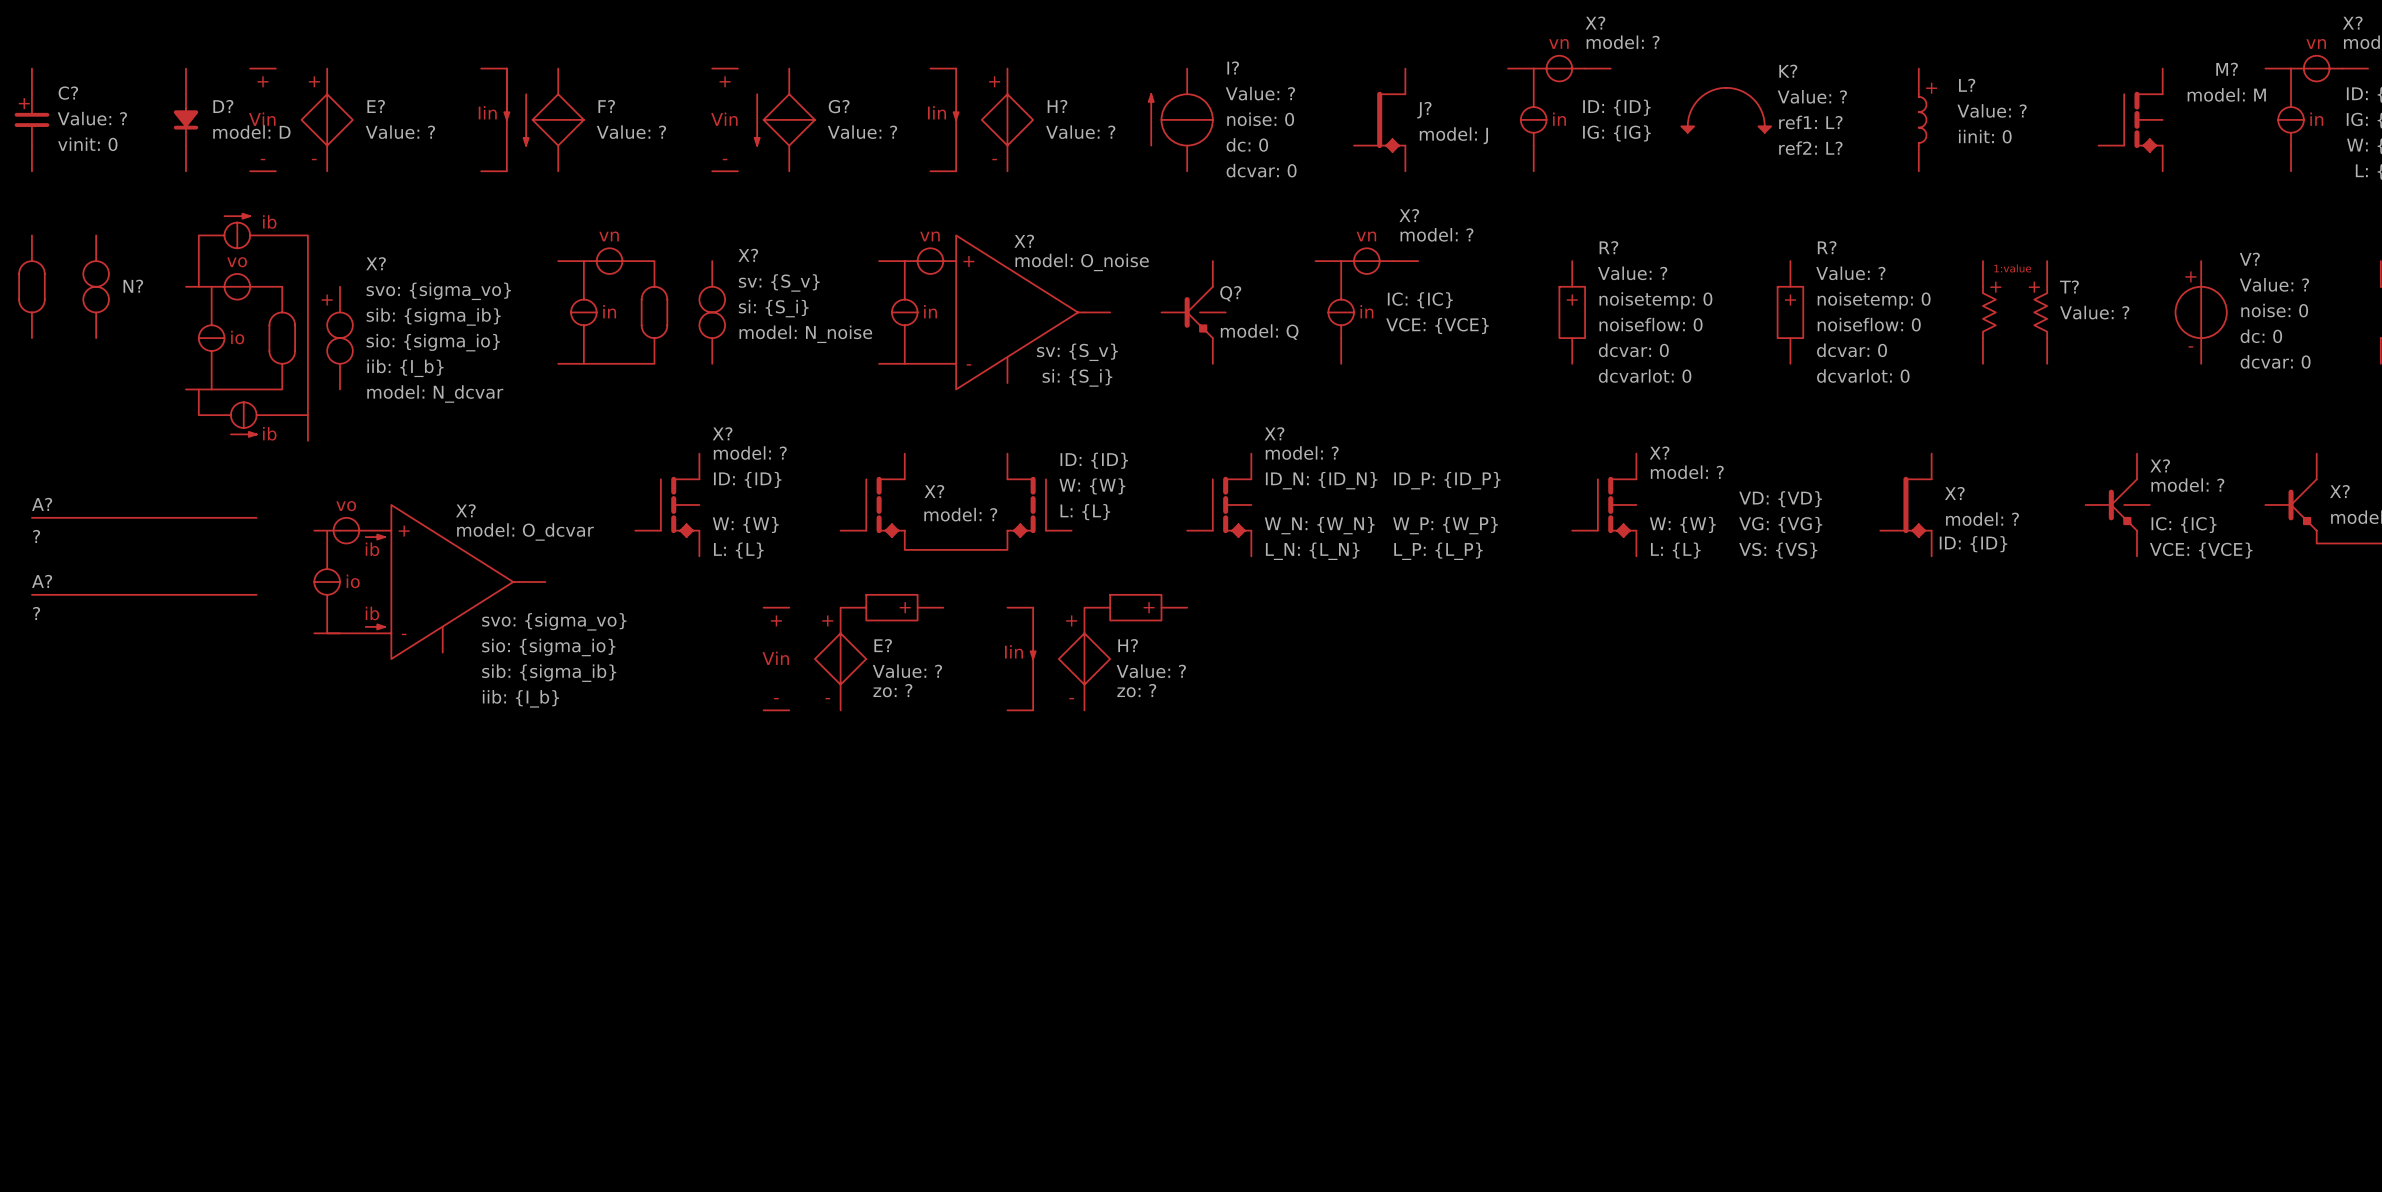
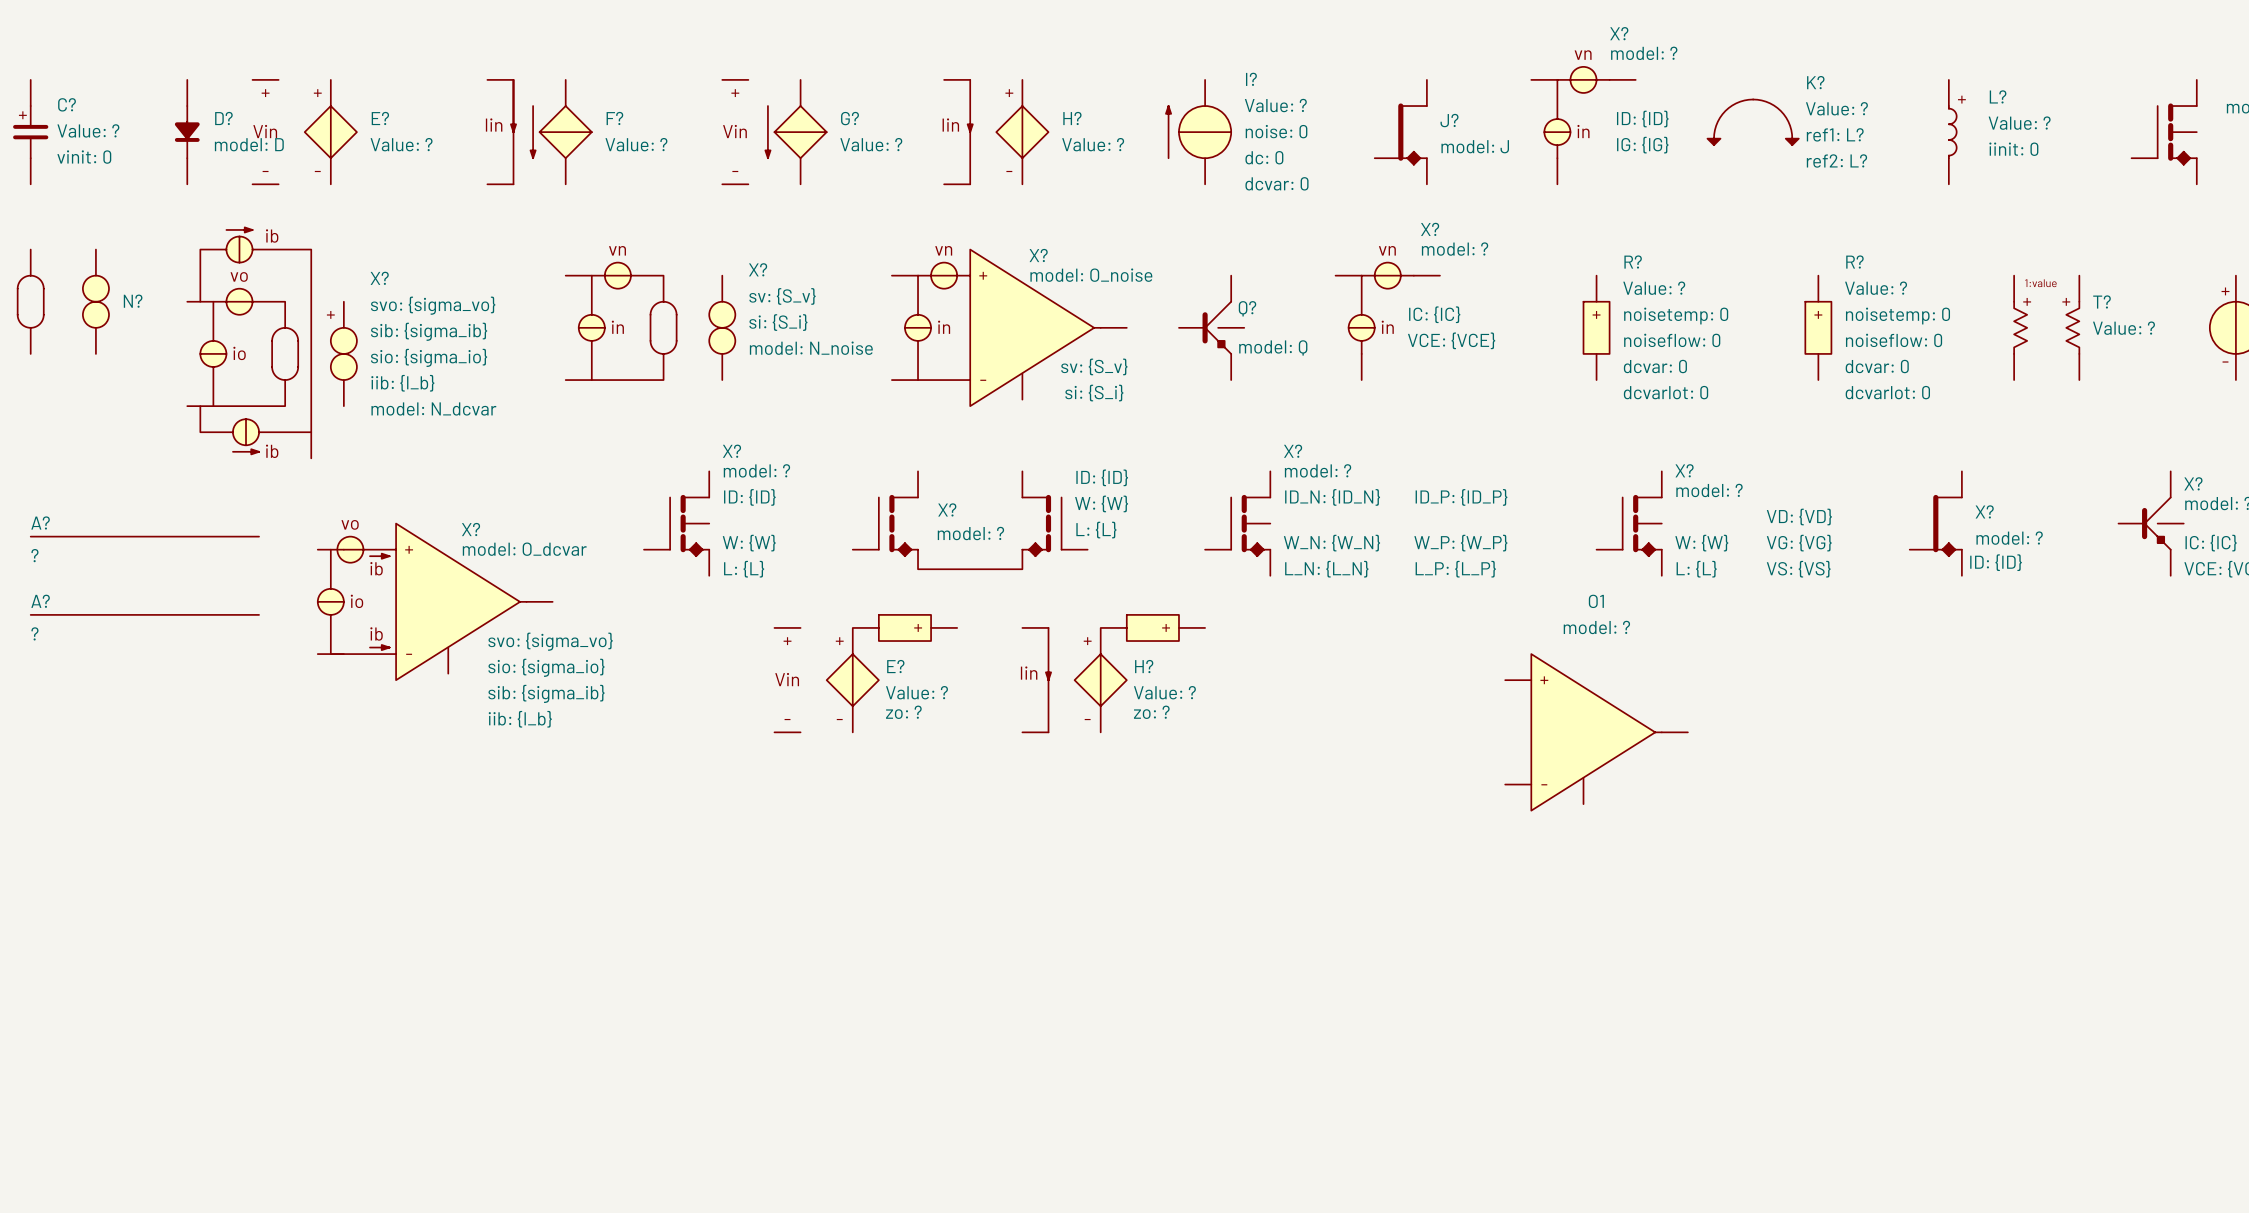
O1: none -> (1596, 732)

